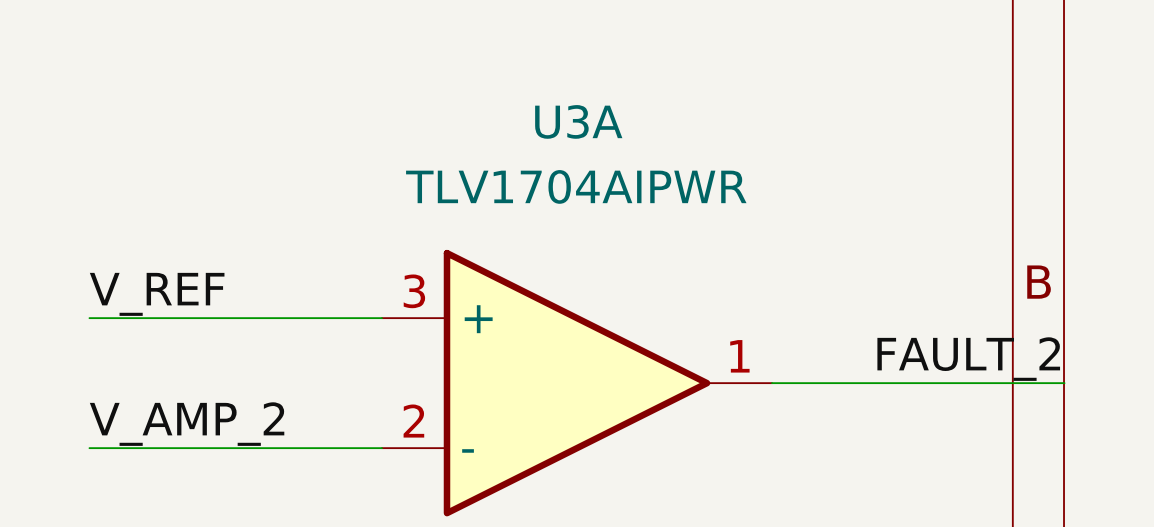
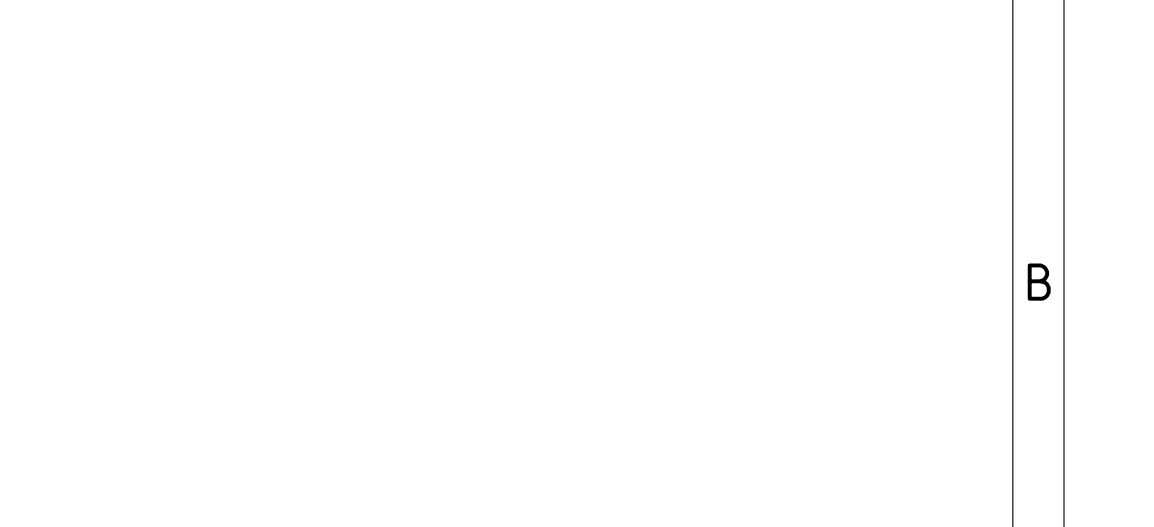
label: V_REF (157, 294) -> none
wire: (89, 318) (381, 318) -> none
label: FAULT_2 (968, 359) -> none
U3A: TLV1704AIPWR (577, 383) -> none
wire: (772, 383) (1064, 383) -> none
label: V_AMP_2 (187, 424) -> none
wire: (89, 448) (381, 448) -> none

